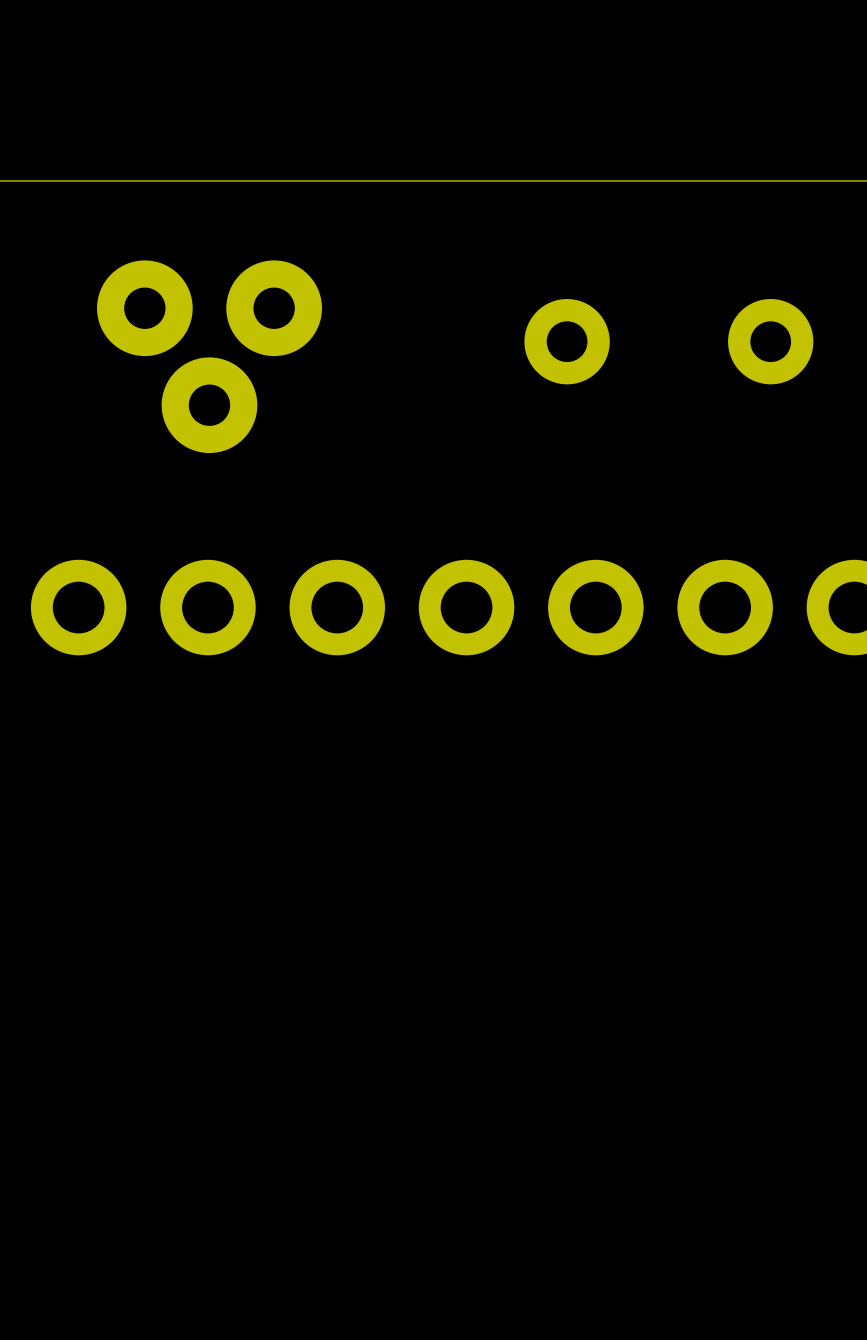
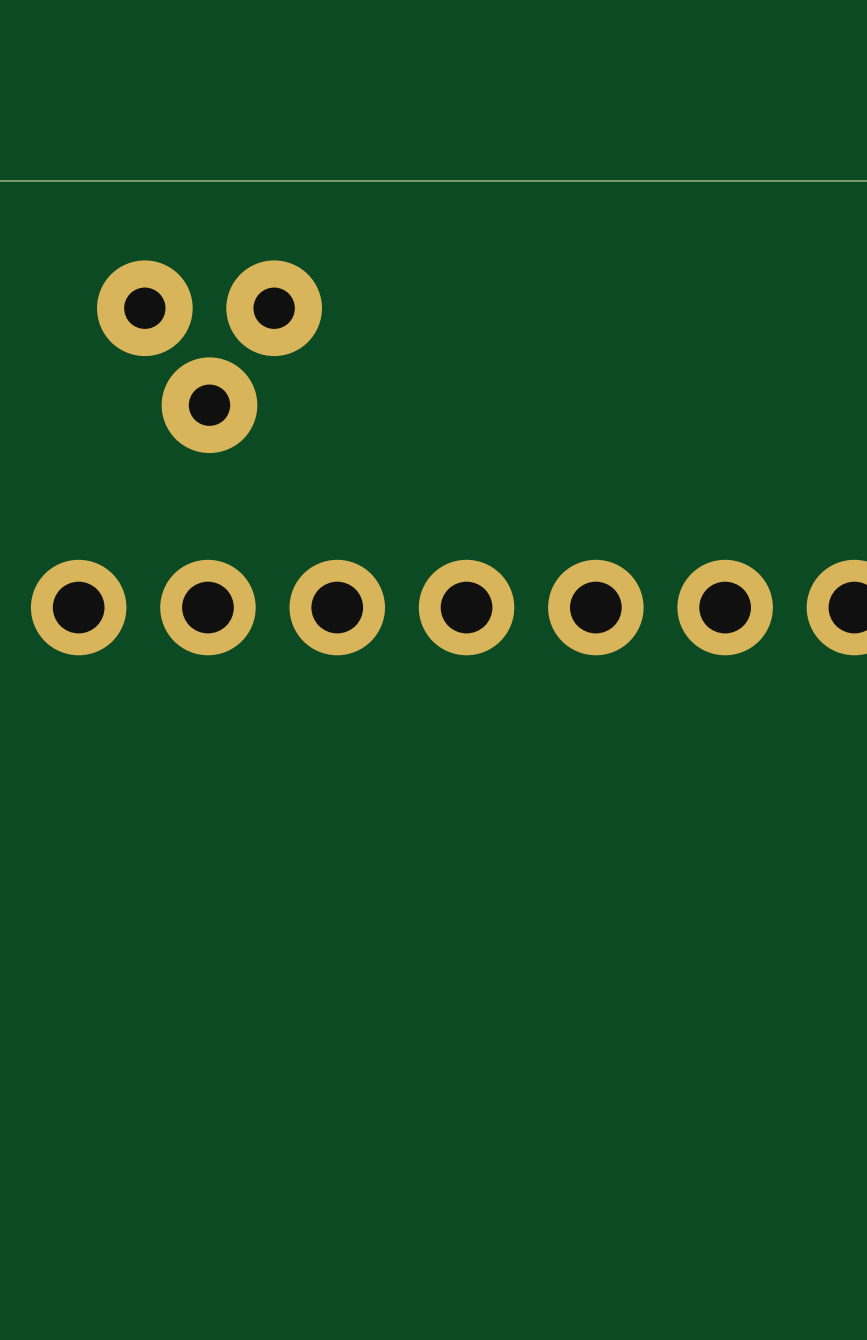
part: (668, 341) -> none

